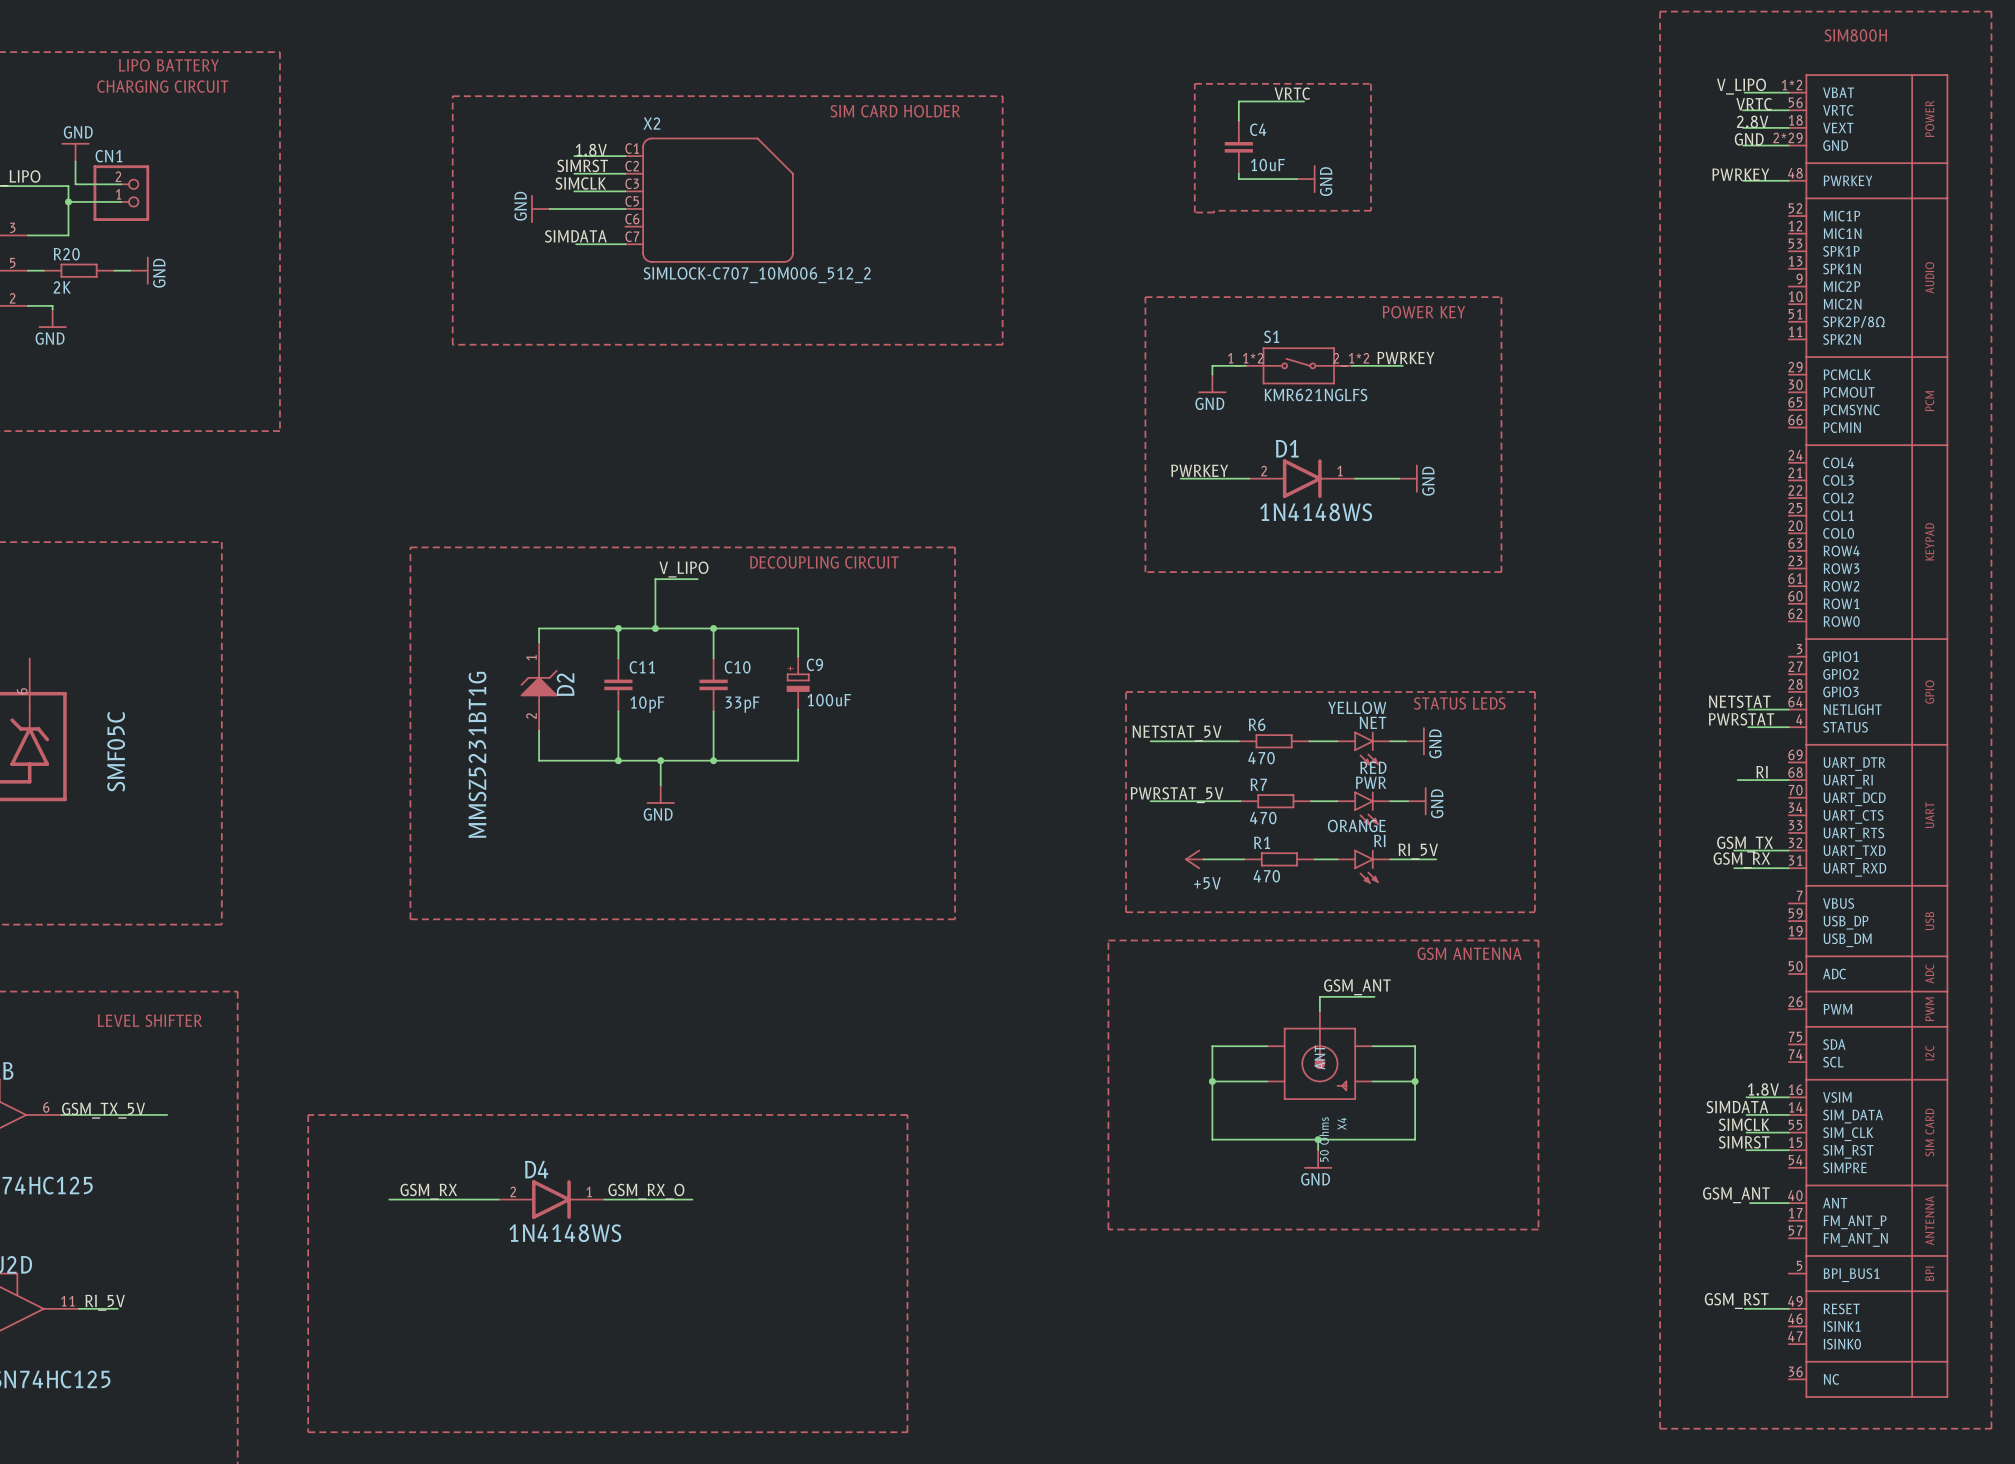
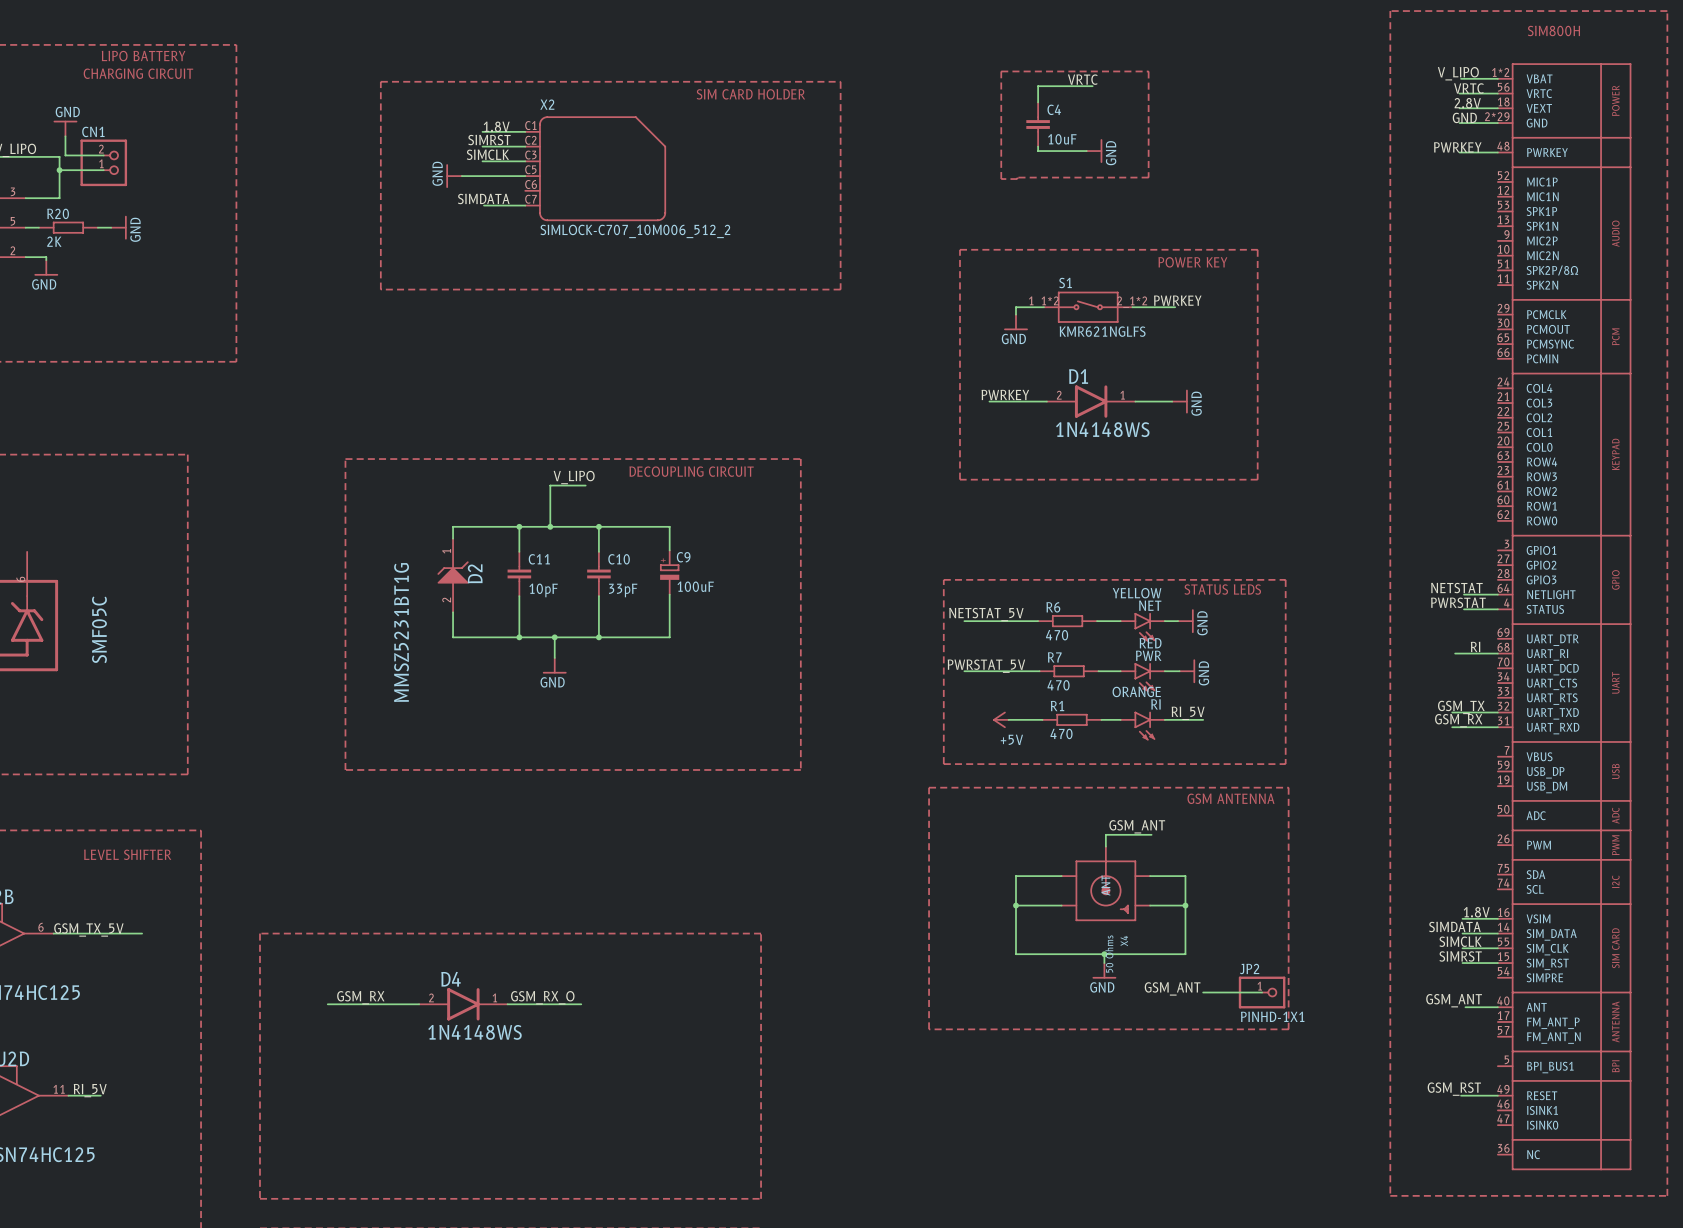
label: none -> GSM_ANT (1172, 988)
wire: none -> (1203, 992) (1262, 992)
JP2: none -> PINHD-1X1 (1262, 992)

